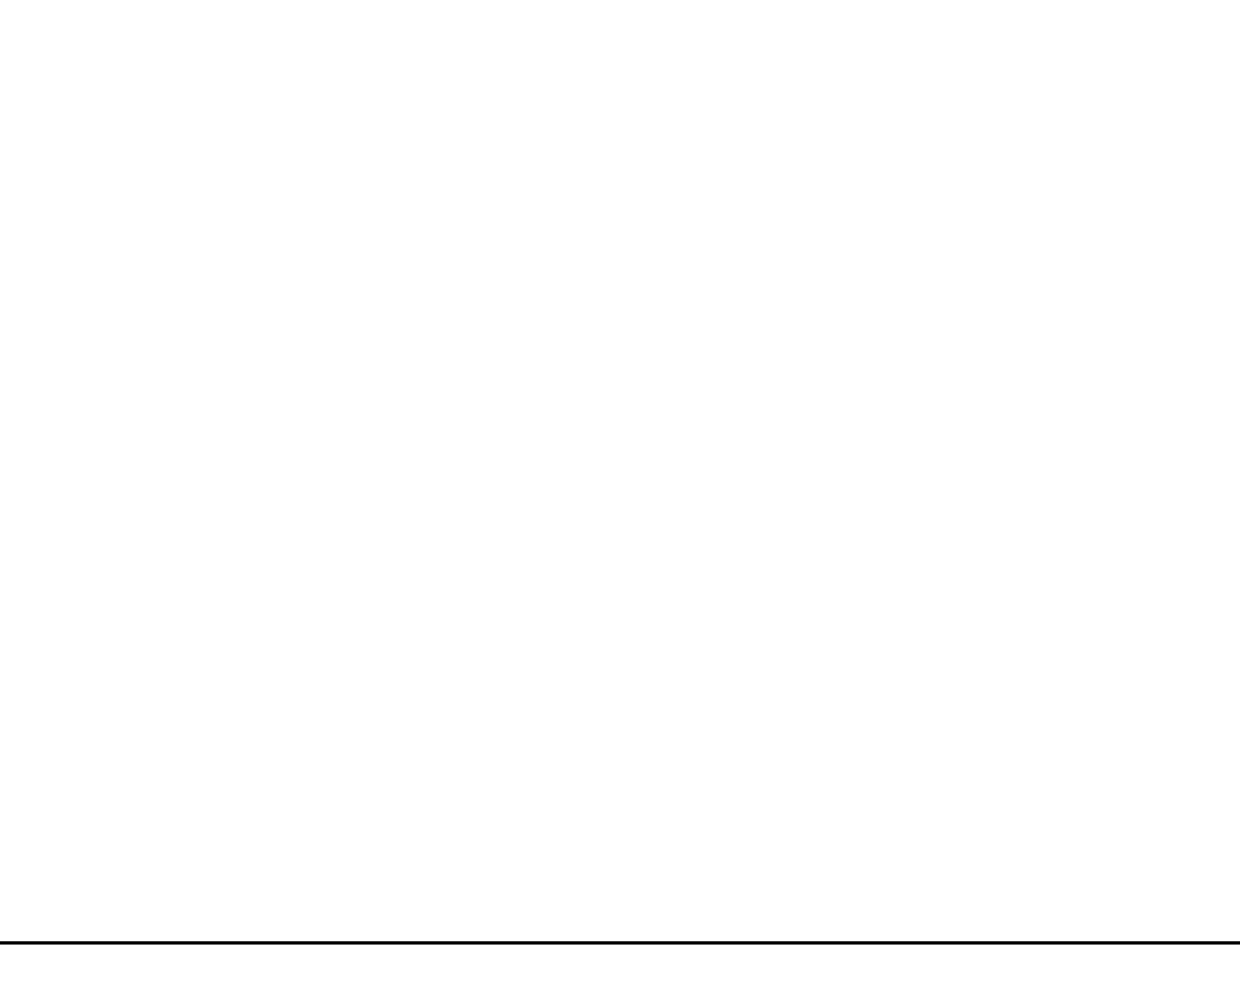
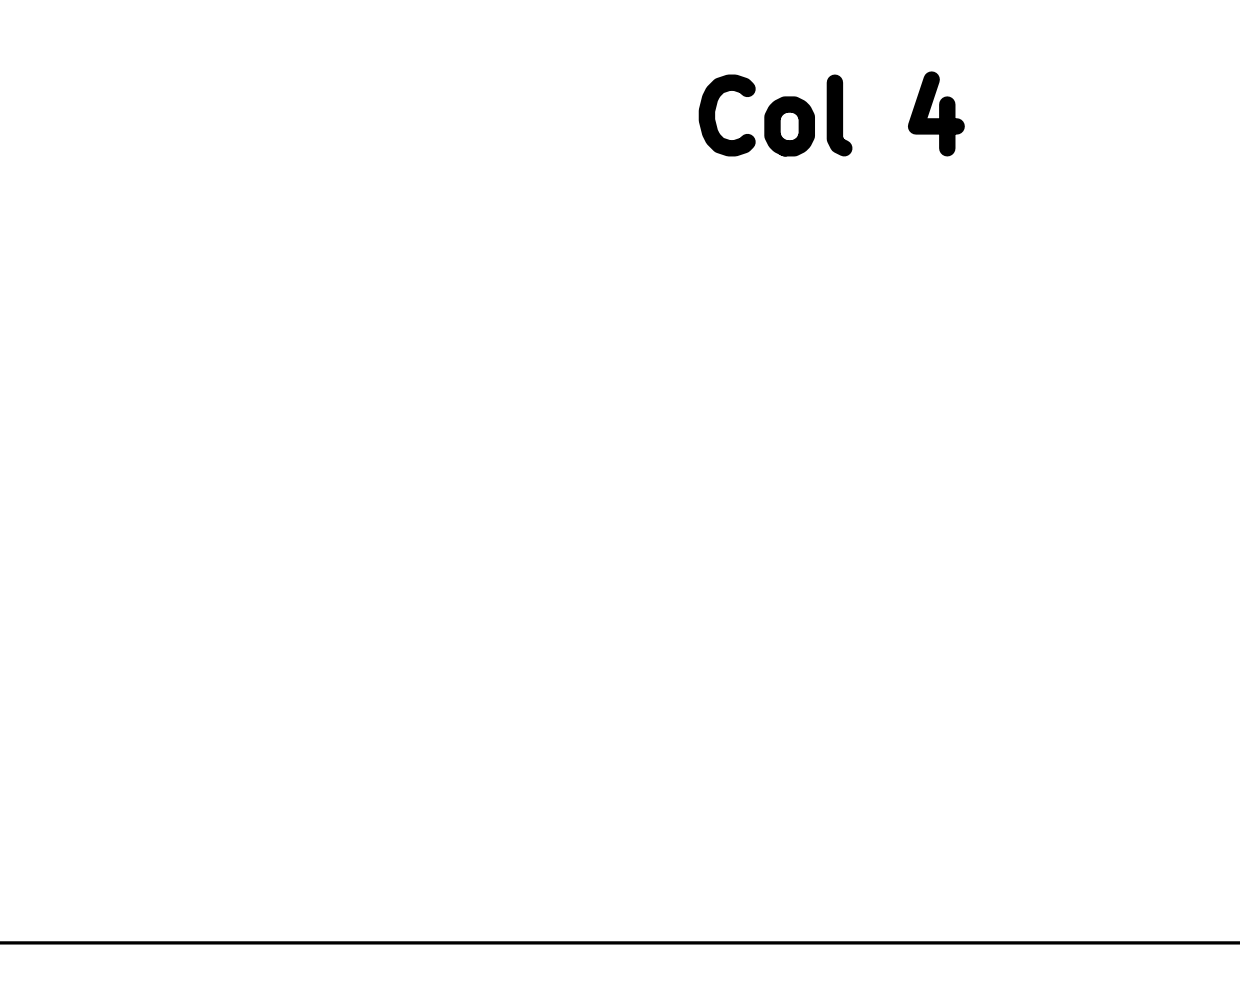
text: none -> Col 4 (831, 113)

